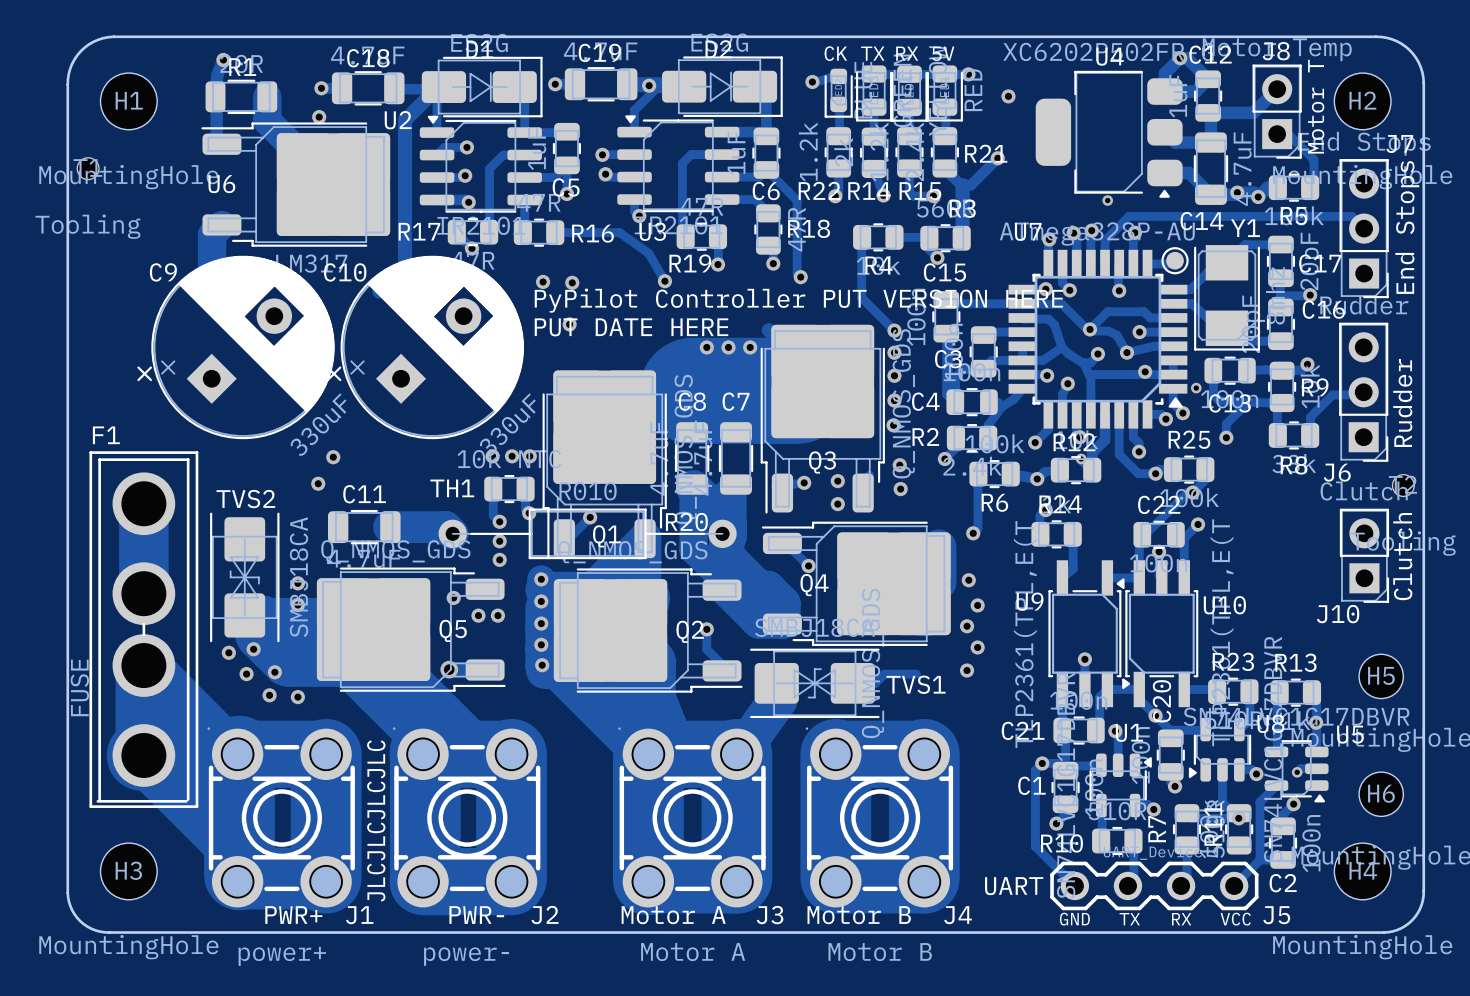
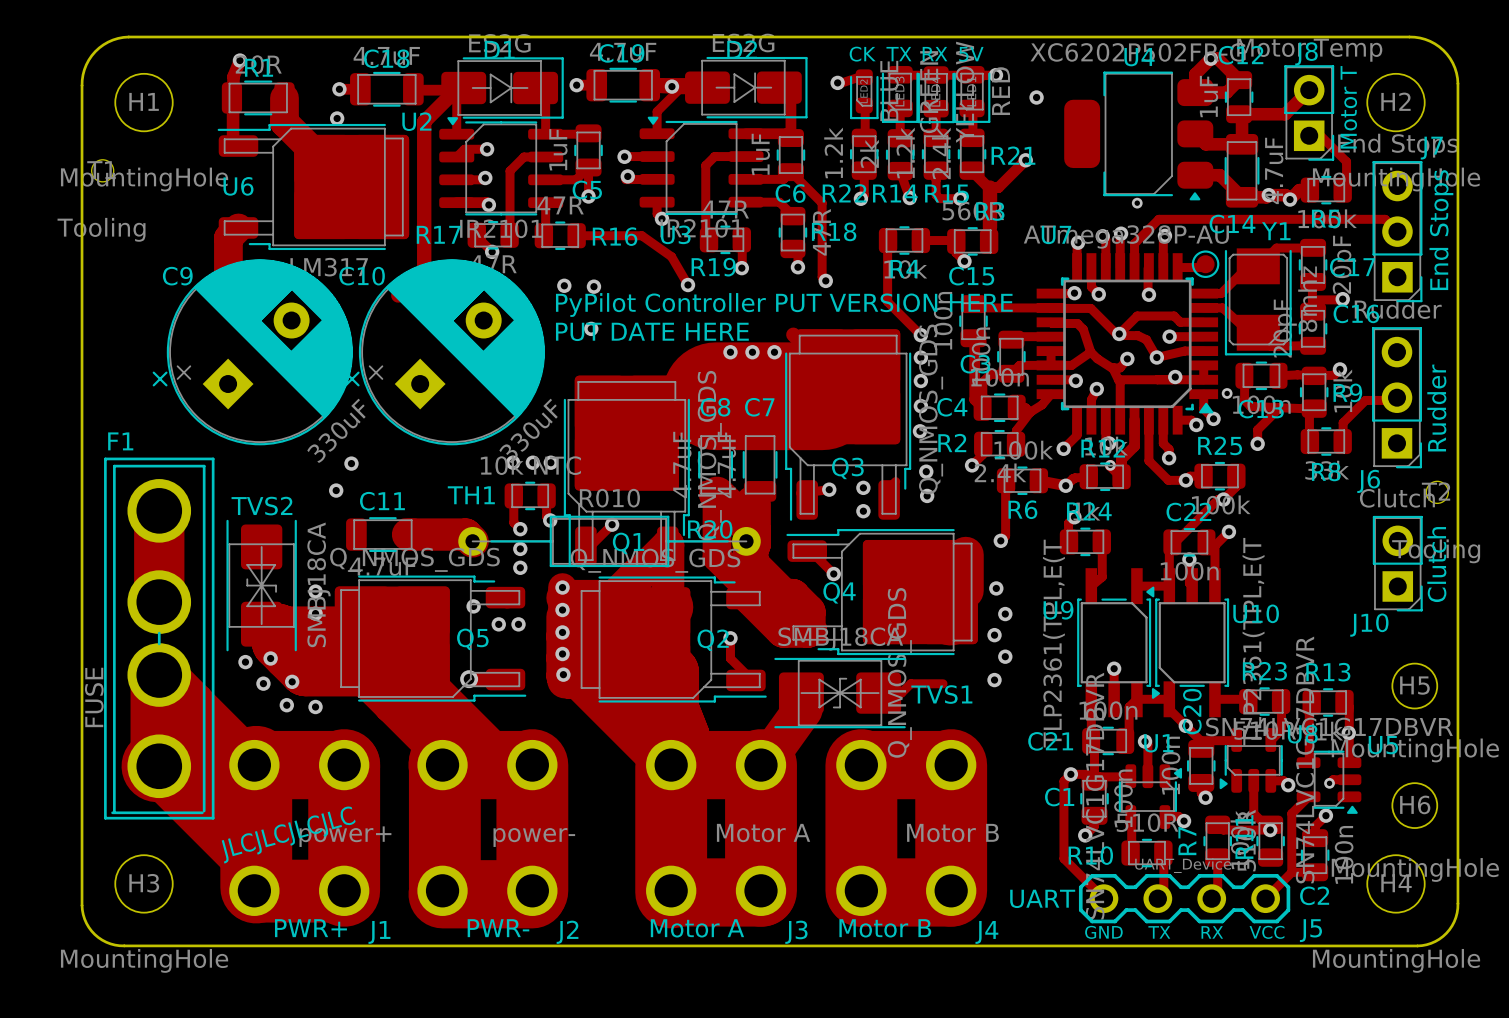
J1 footprint: [207, 727, 355, 908] -> [229, 739, 370, 916]
J2 footprint: [393, 727, 541, 908] -> [417, 739, 558, 916]
J3 footprint: [618, 727, 766, 908] -> [646, 739, 787, 916]
J4 footprint: [805, 727, 954, 908] -> [836, 739, 977, 916]
text rotation: 0° (376, 820) -> 75° clockwise (288, 834)
J3 value position: Motor A (693, 952) -> Motor A (763, 833)
J4 value position: Motor B (880, 952) -> Motor B (952, 833)
J1 value position: power+ (282, 956) -> power+ (345, 836)
J2 value position: power- (466, 956) -> power- (534, 837)

